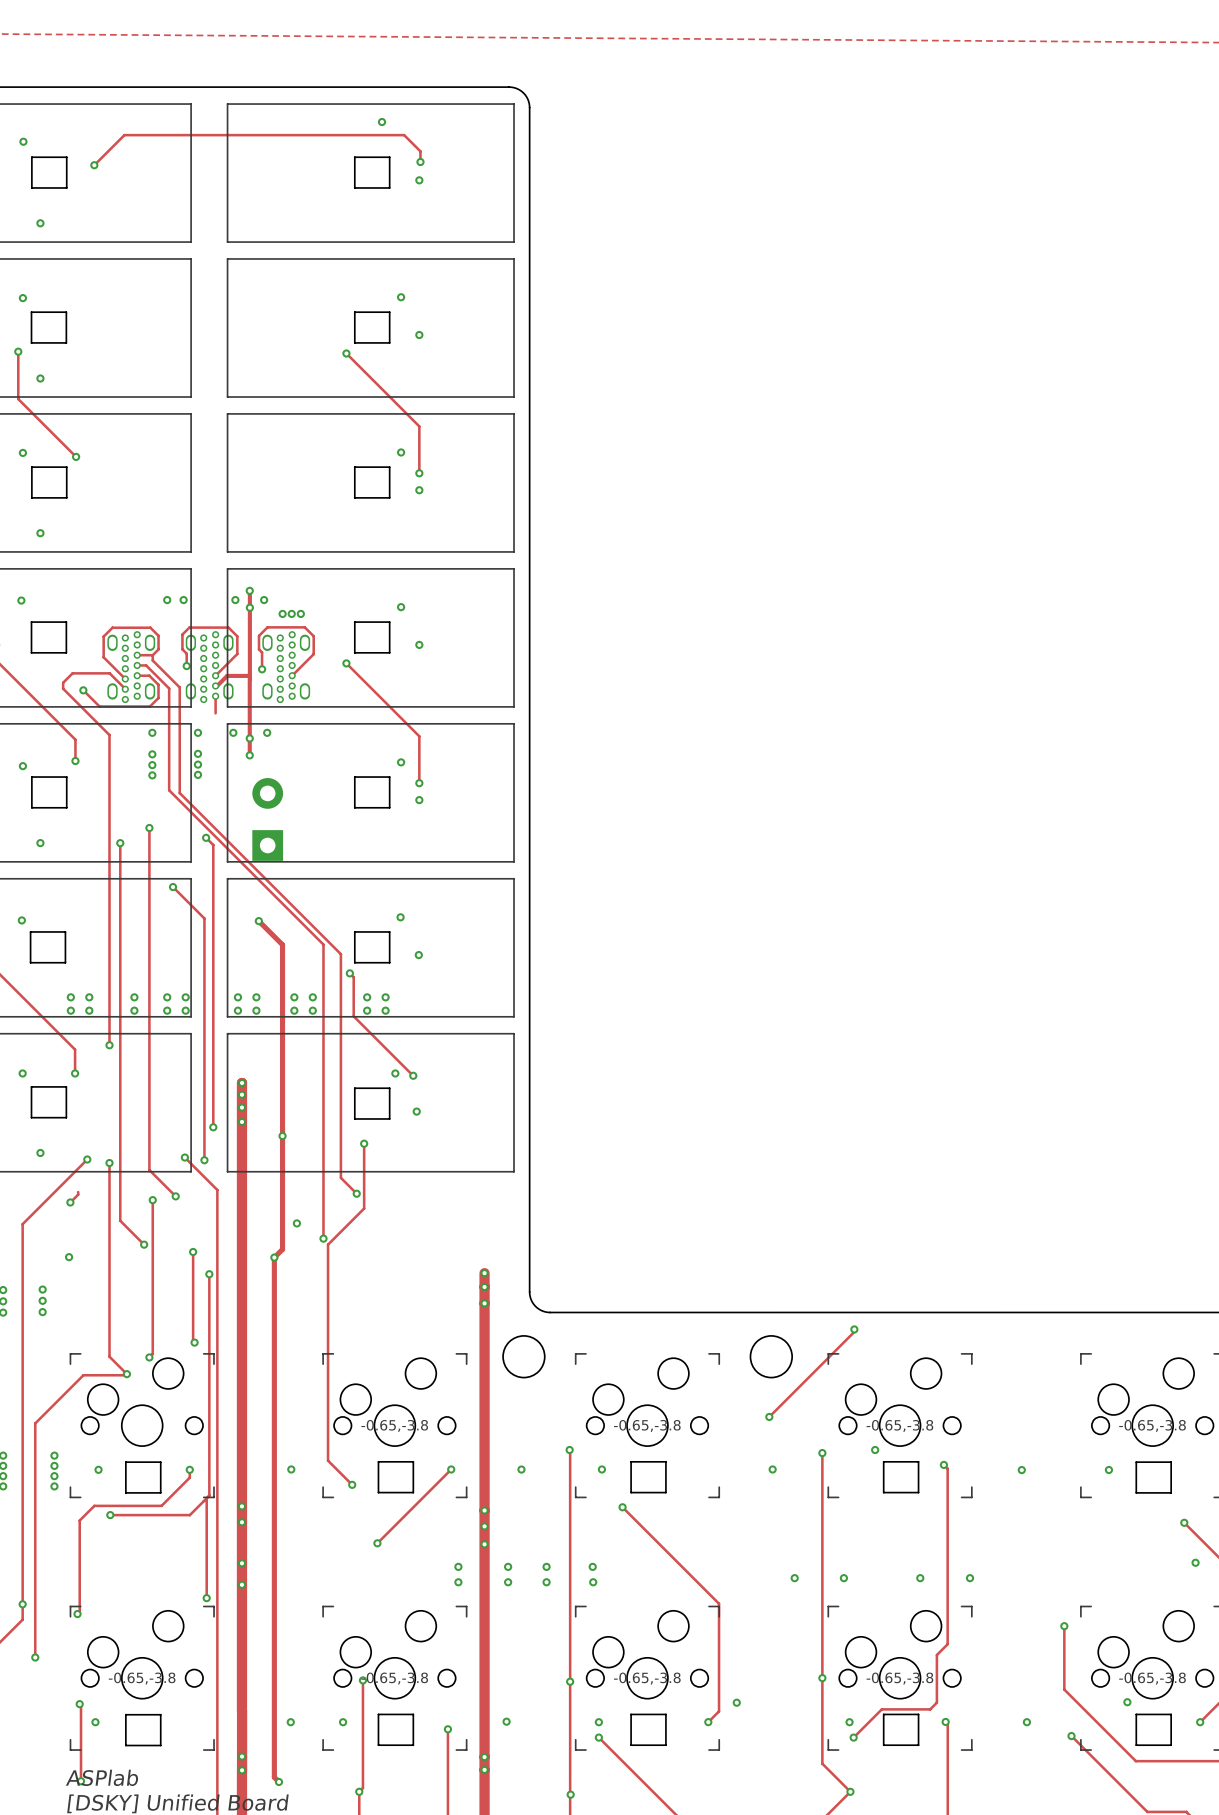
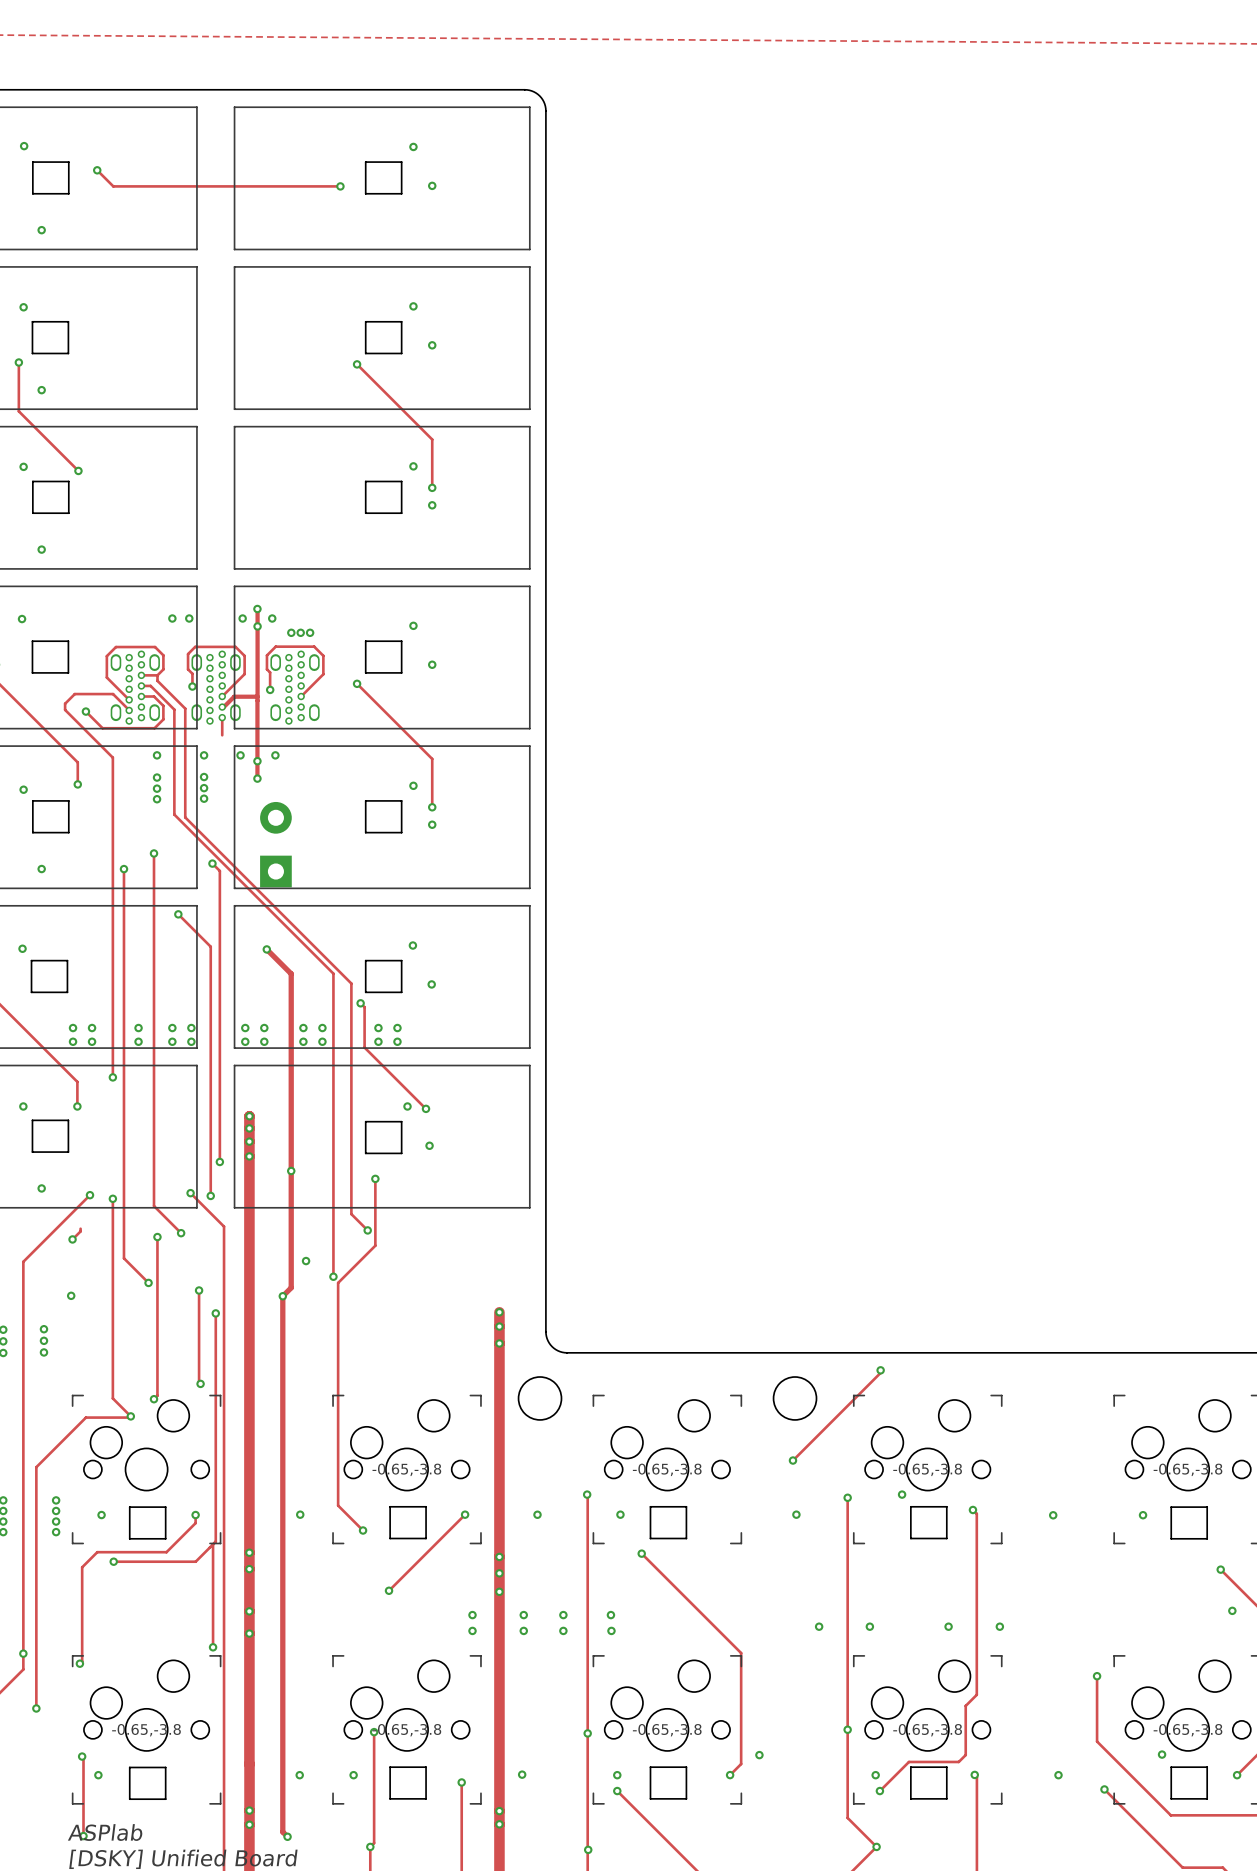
via: (382, 122) -> none
via: none -> (413, 146)
track: (420, 162) (420, 151) (404, 135) (124, 135) (94, 165) -> (340, 186) (113, 186) (97, 170)
via: (420, 162) -> none
via: none -> (340, 186)

